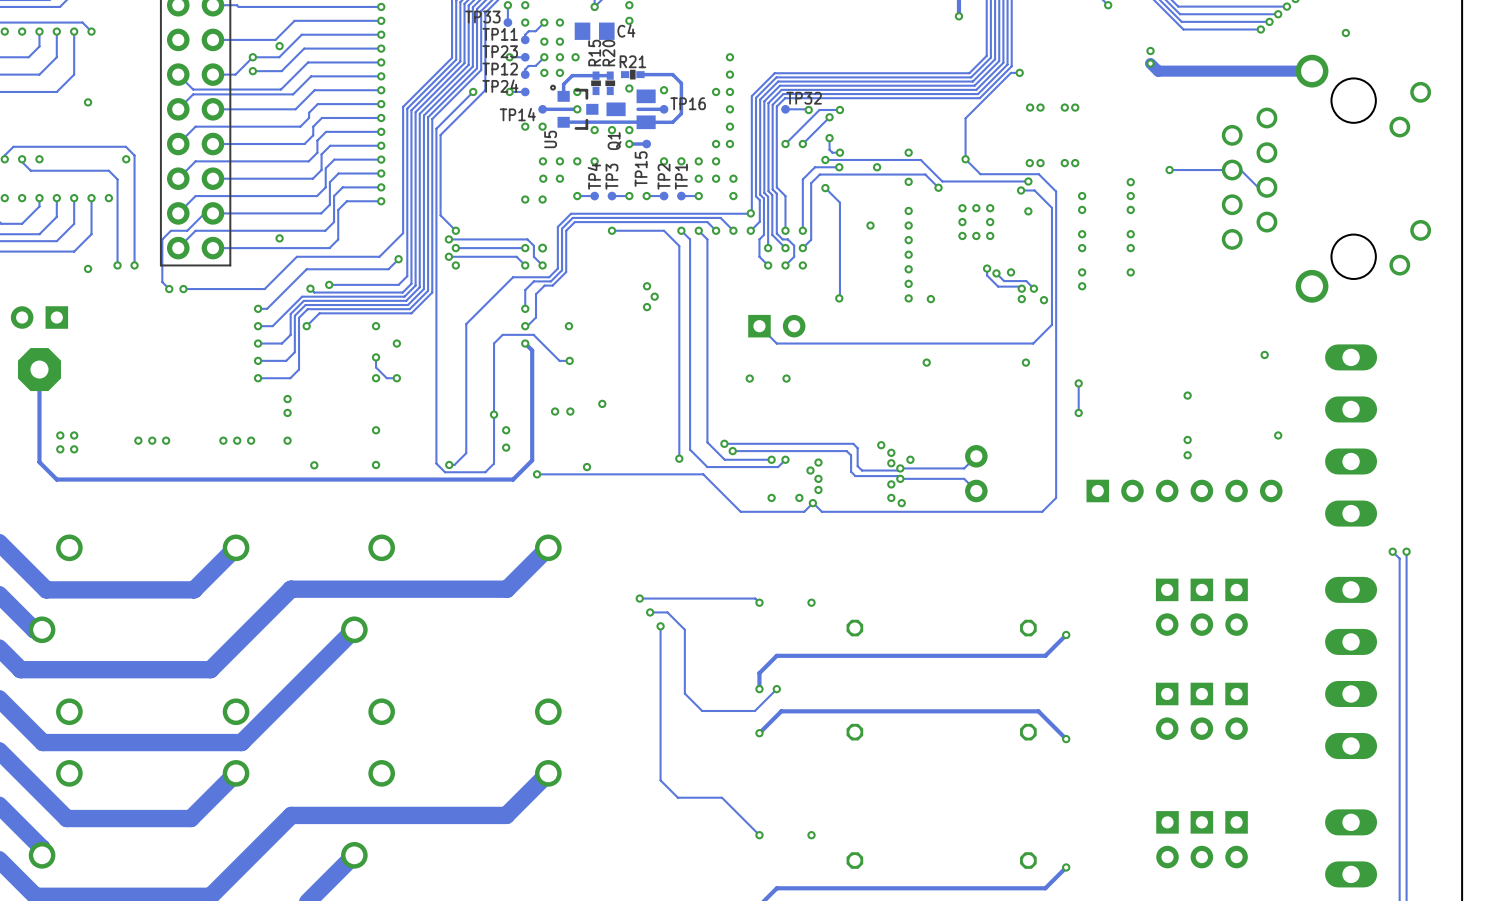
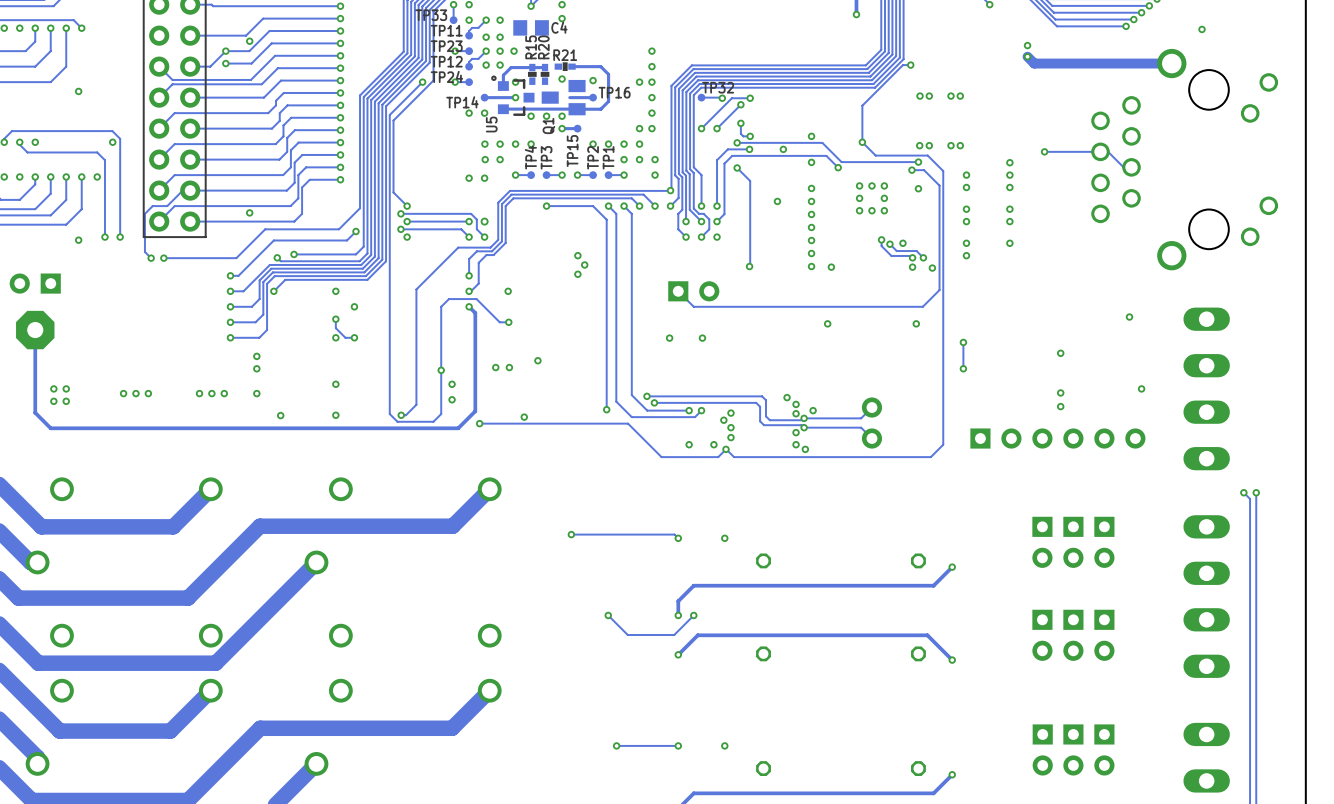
track: (650, 612) (667, 612) (684, 629) (684, 693) (702, 710) -> (608, 615) (627, 634)
via: (650, 612) -> none
track: (660, 626) (660, 780) (677, 797) (721, 797) (759, 835) -> (616, 745) (678, 745)
via: (660, 626) -> none
via: none -> (608, 615)
via: none -> (616, 745)

